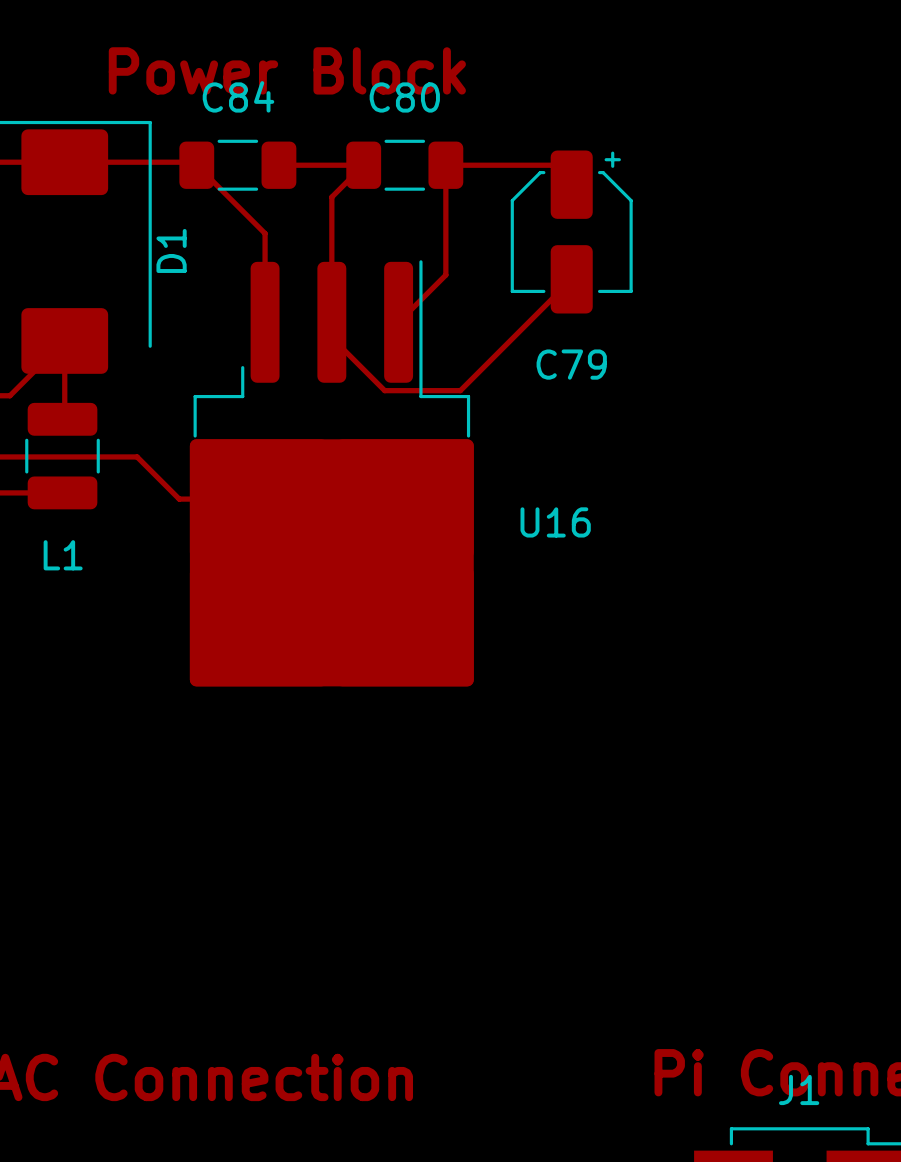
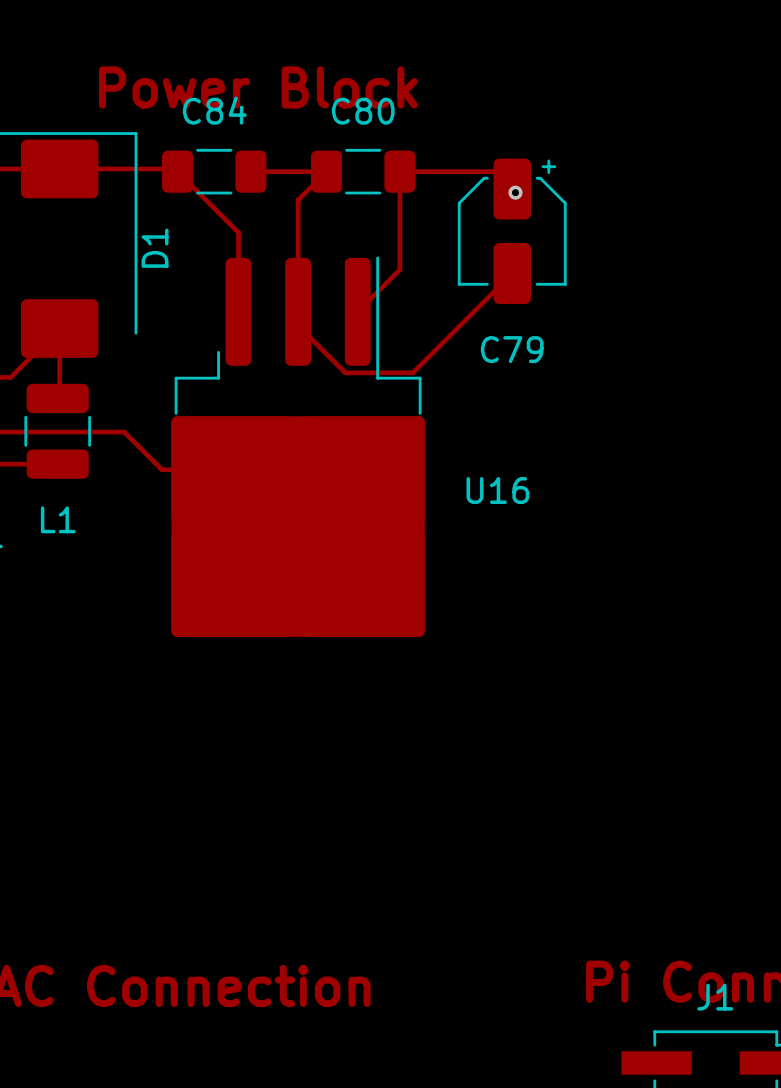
via: none -> (515, 192)

